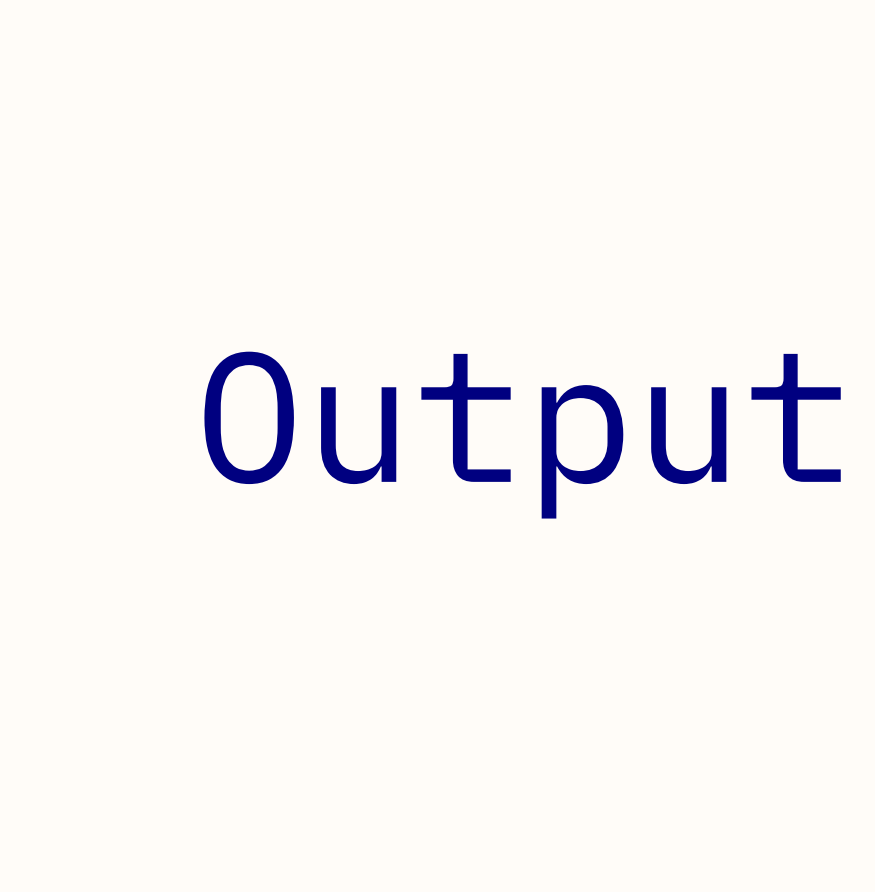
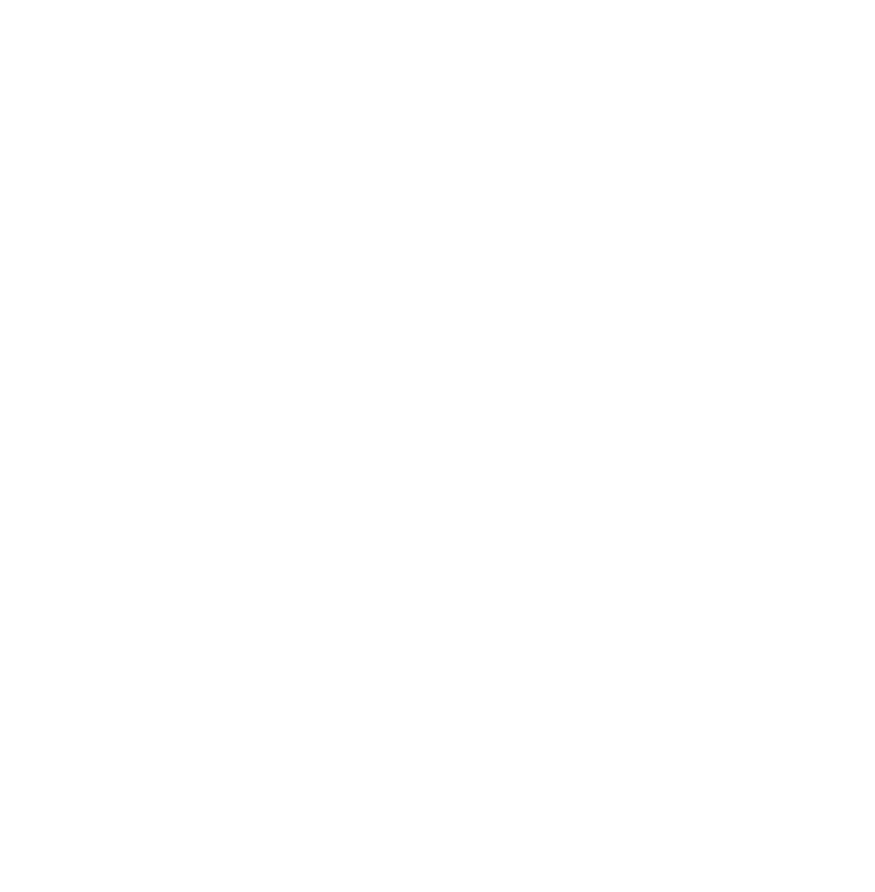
text: Output (522, 435) -> none

